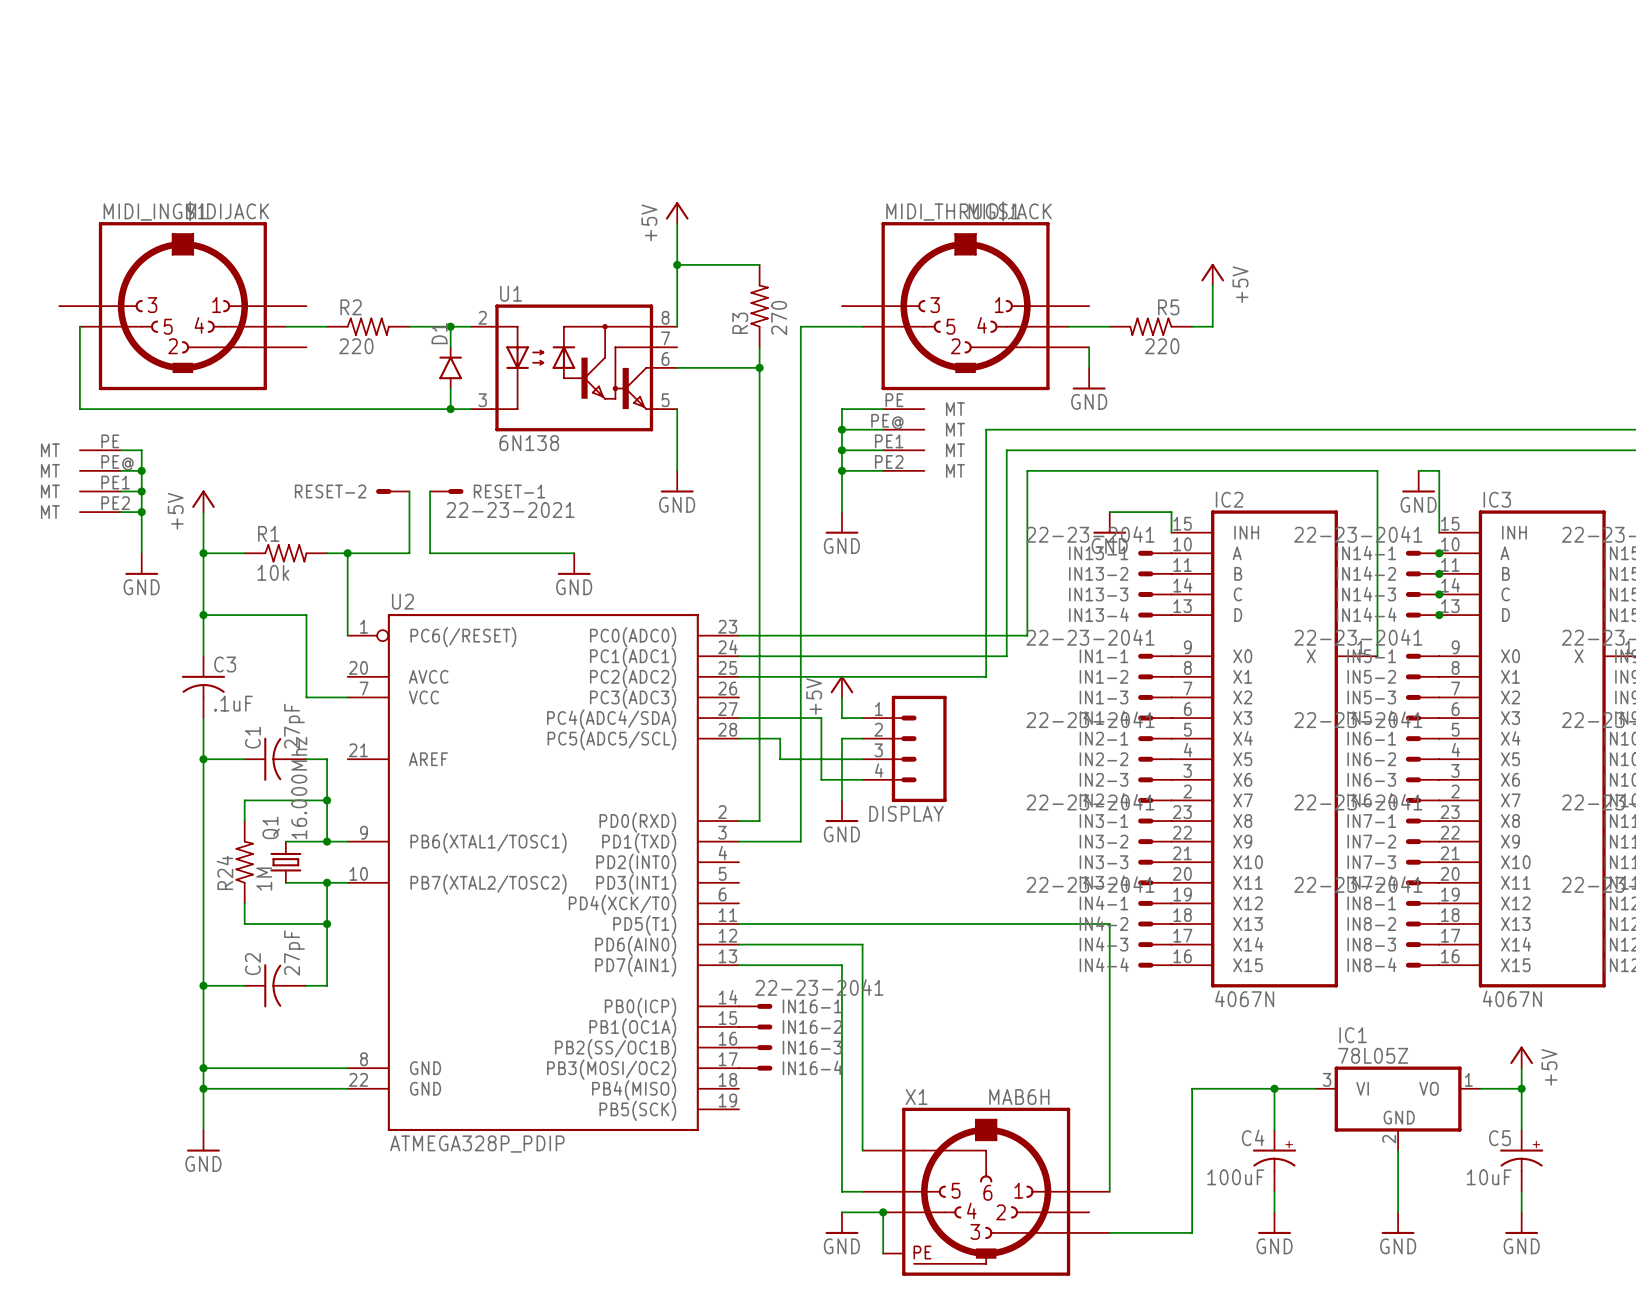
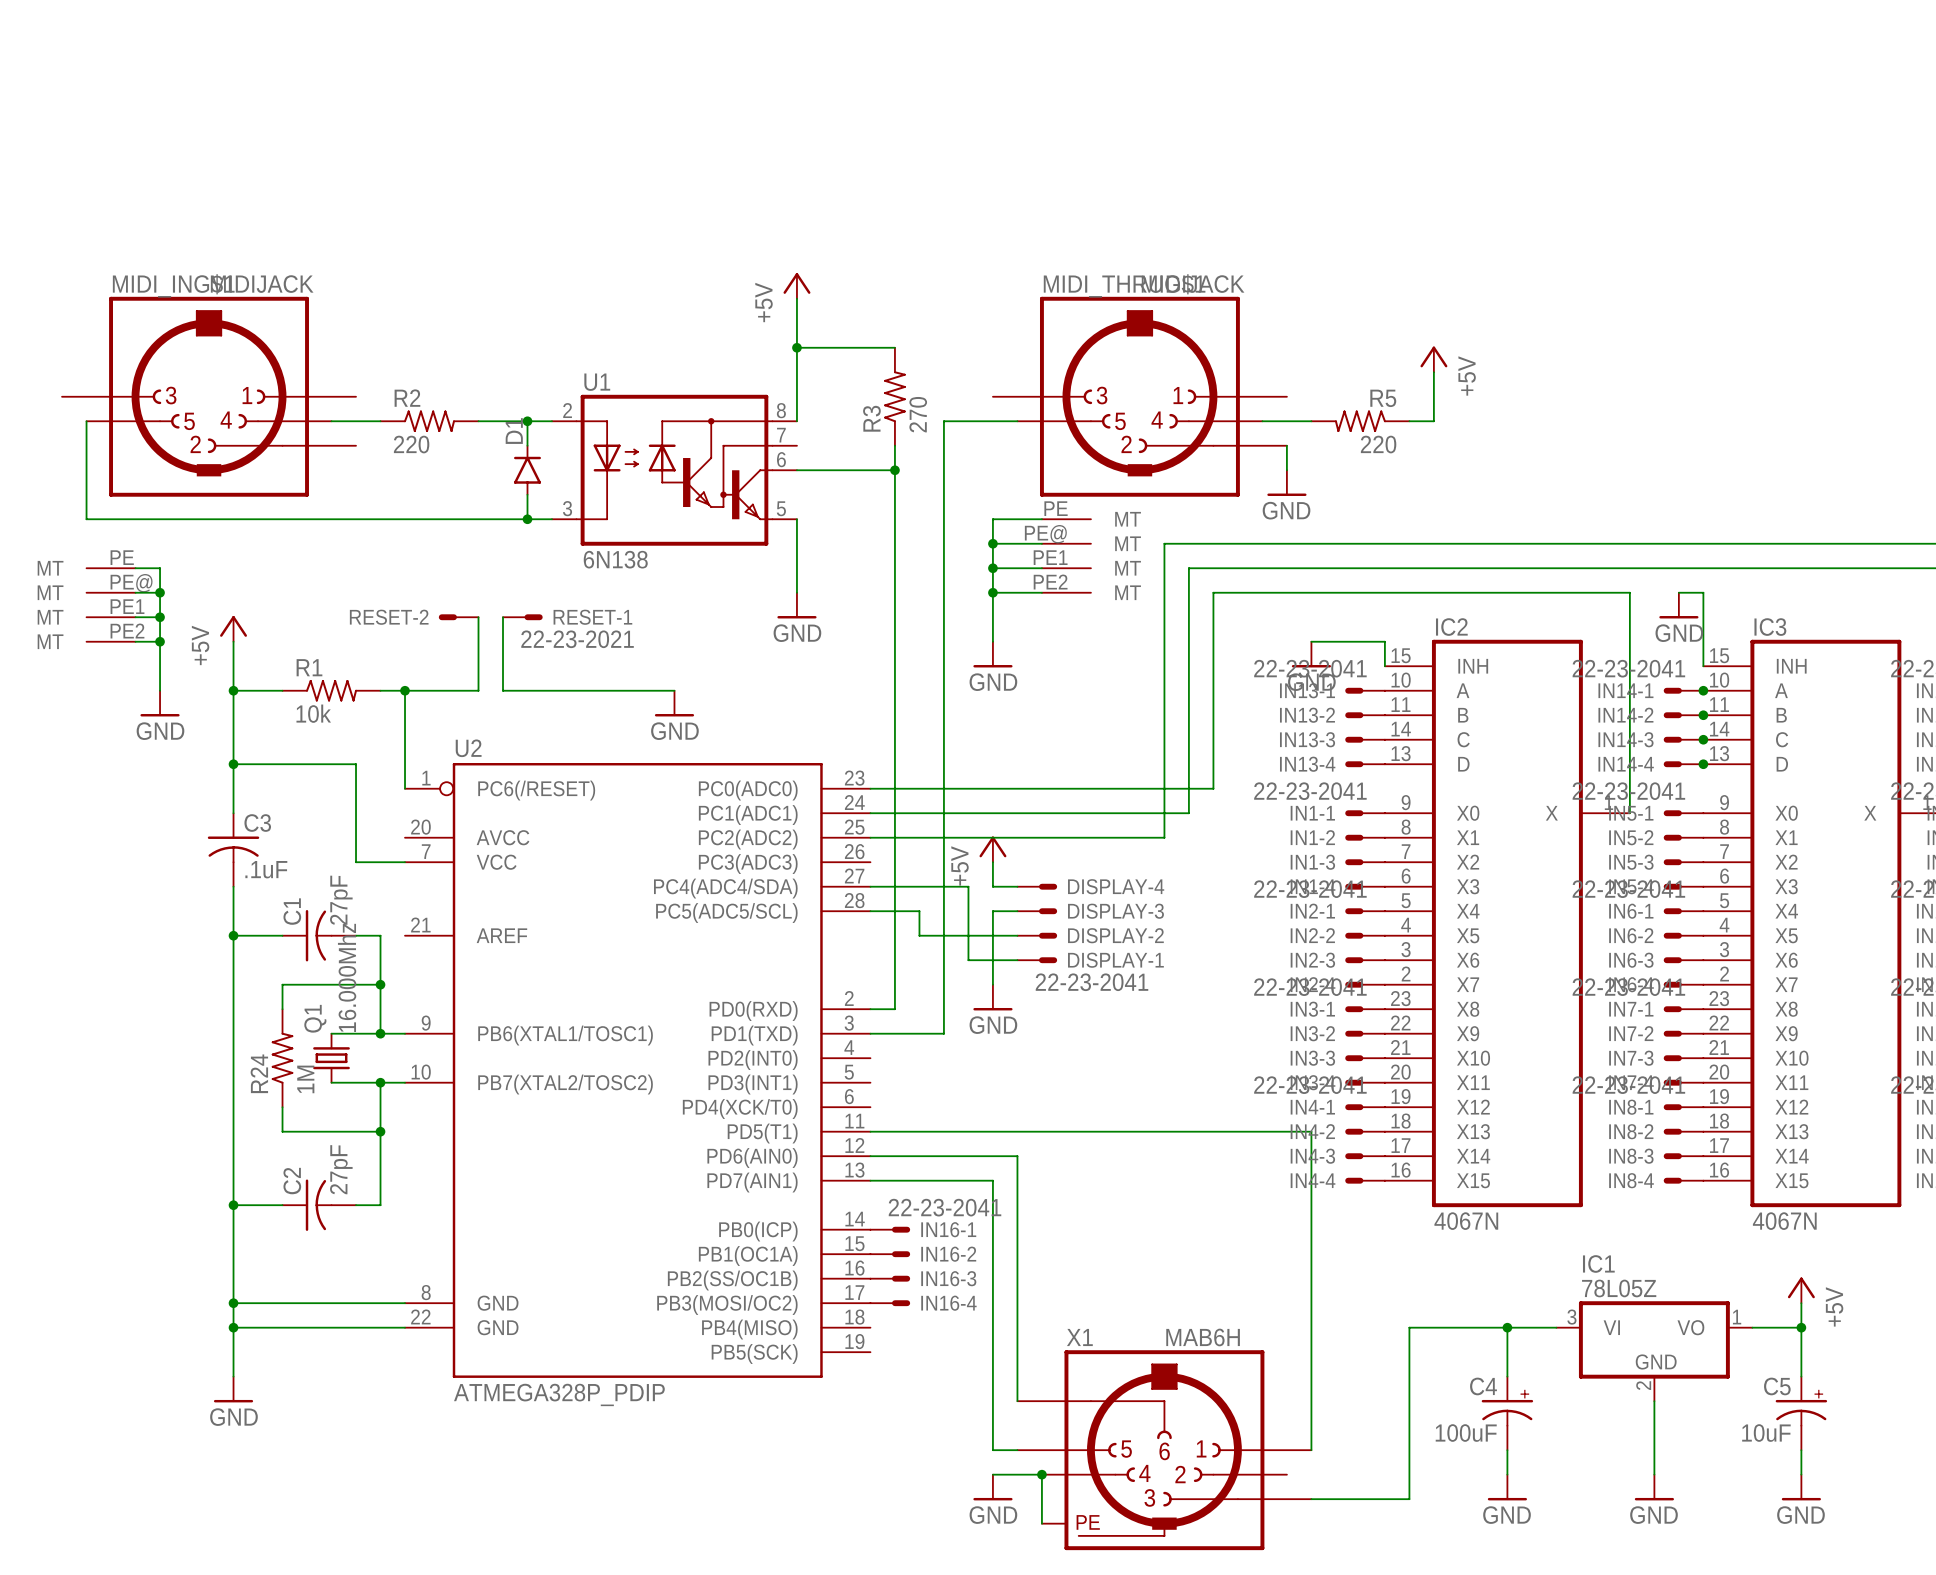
DISPLAY-4: none -> (1037, 886)
DISPLAY-3: none -> (1037, 911)
DISPLAY: (904, 748) -> none
DISPLAY-2: none -> (1037, 935)
DISPLAY-1: none -> 22-23-2041 (1037, 960)

